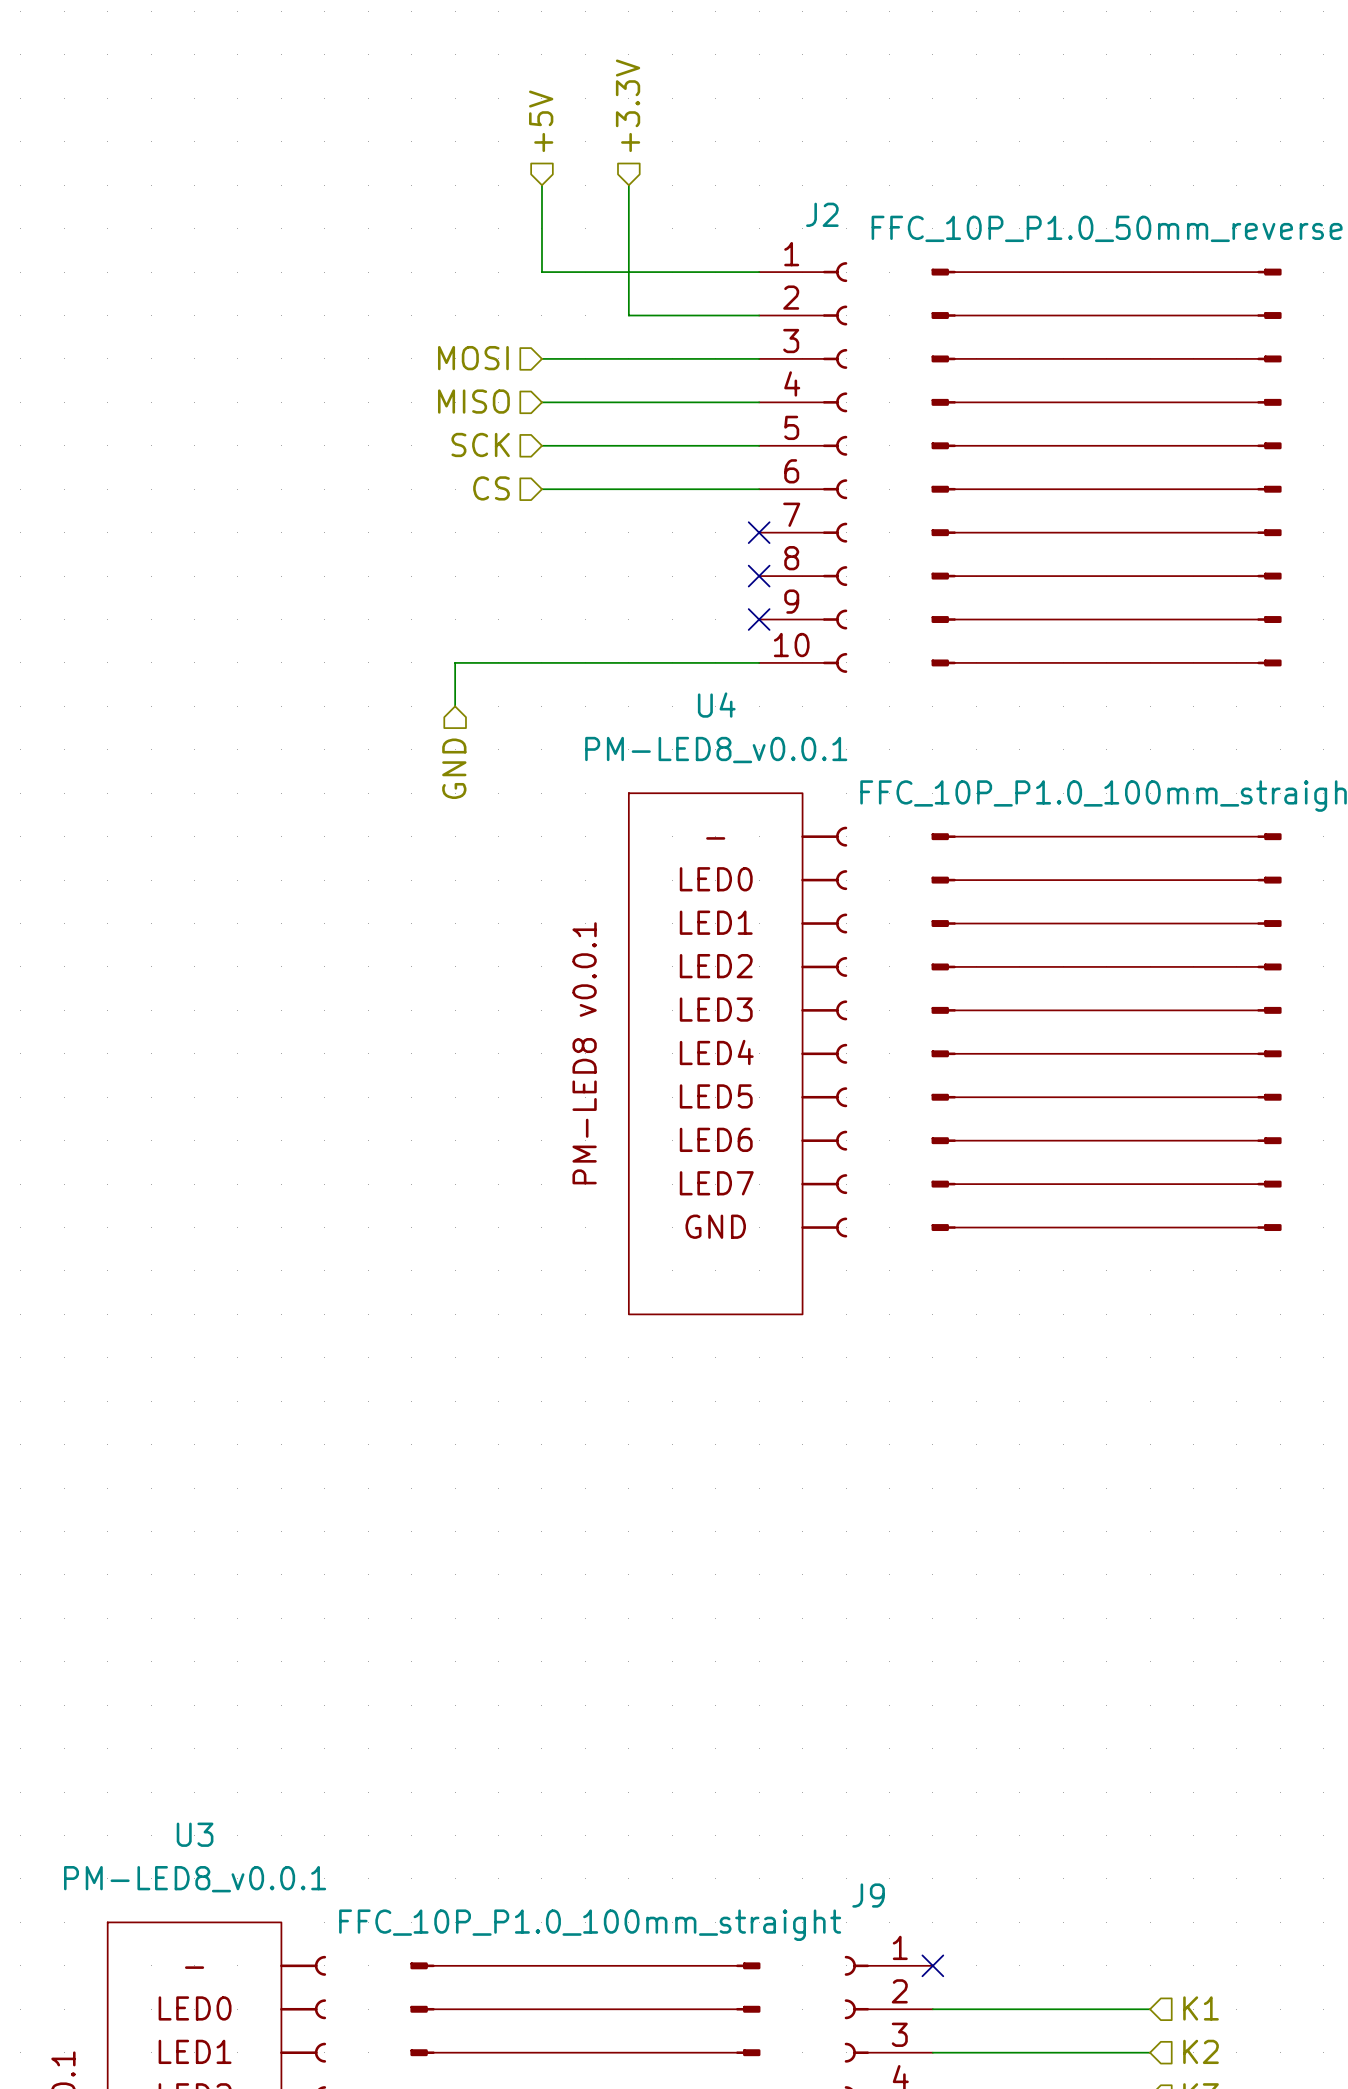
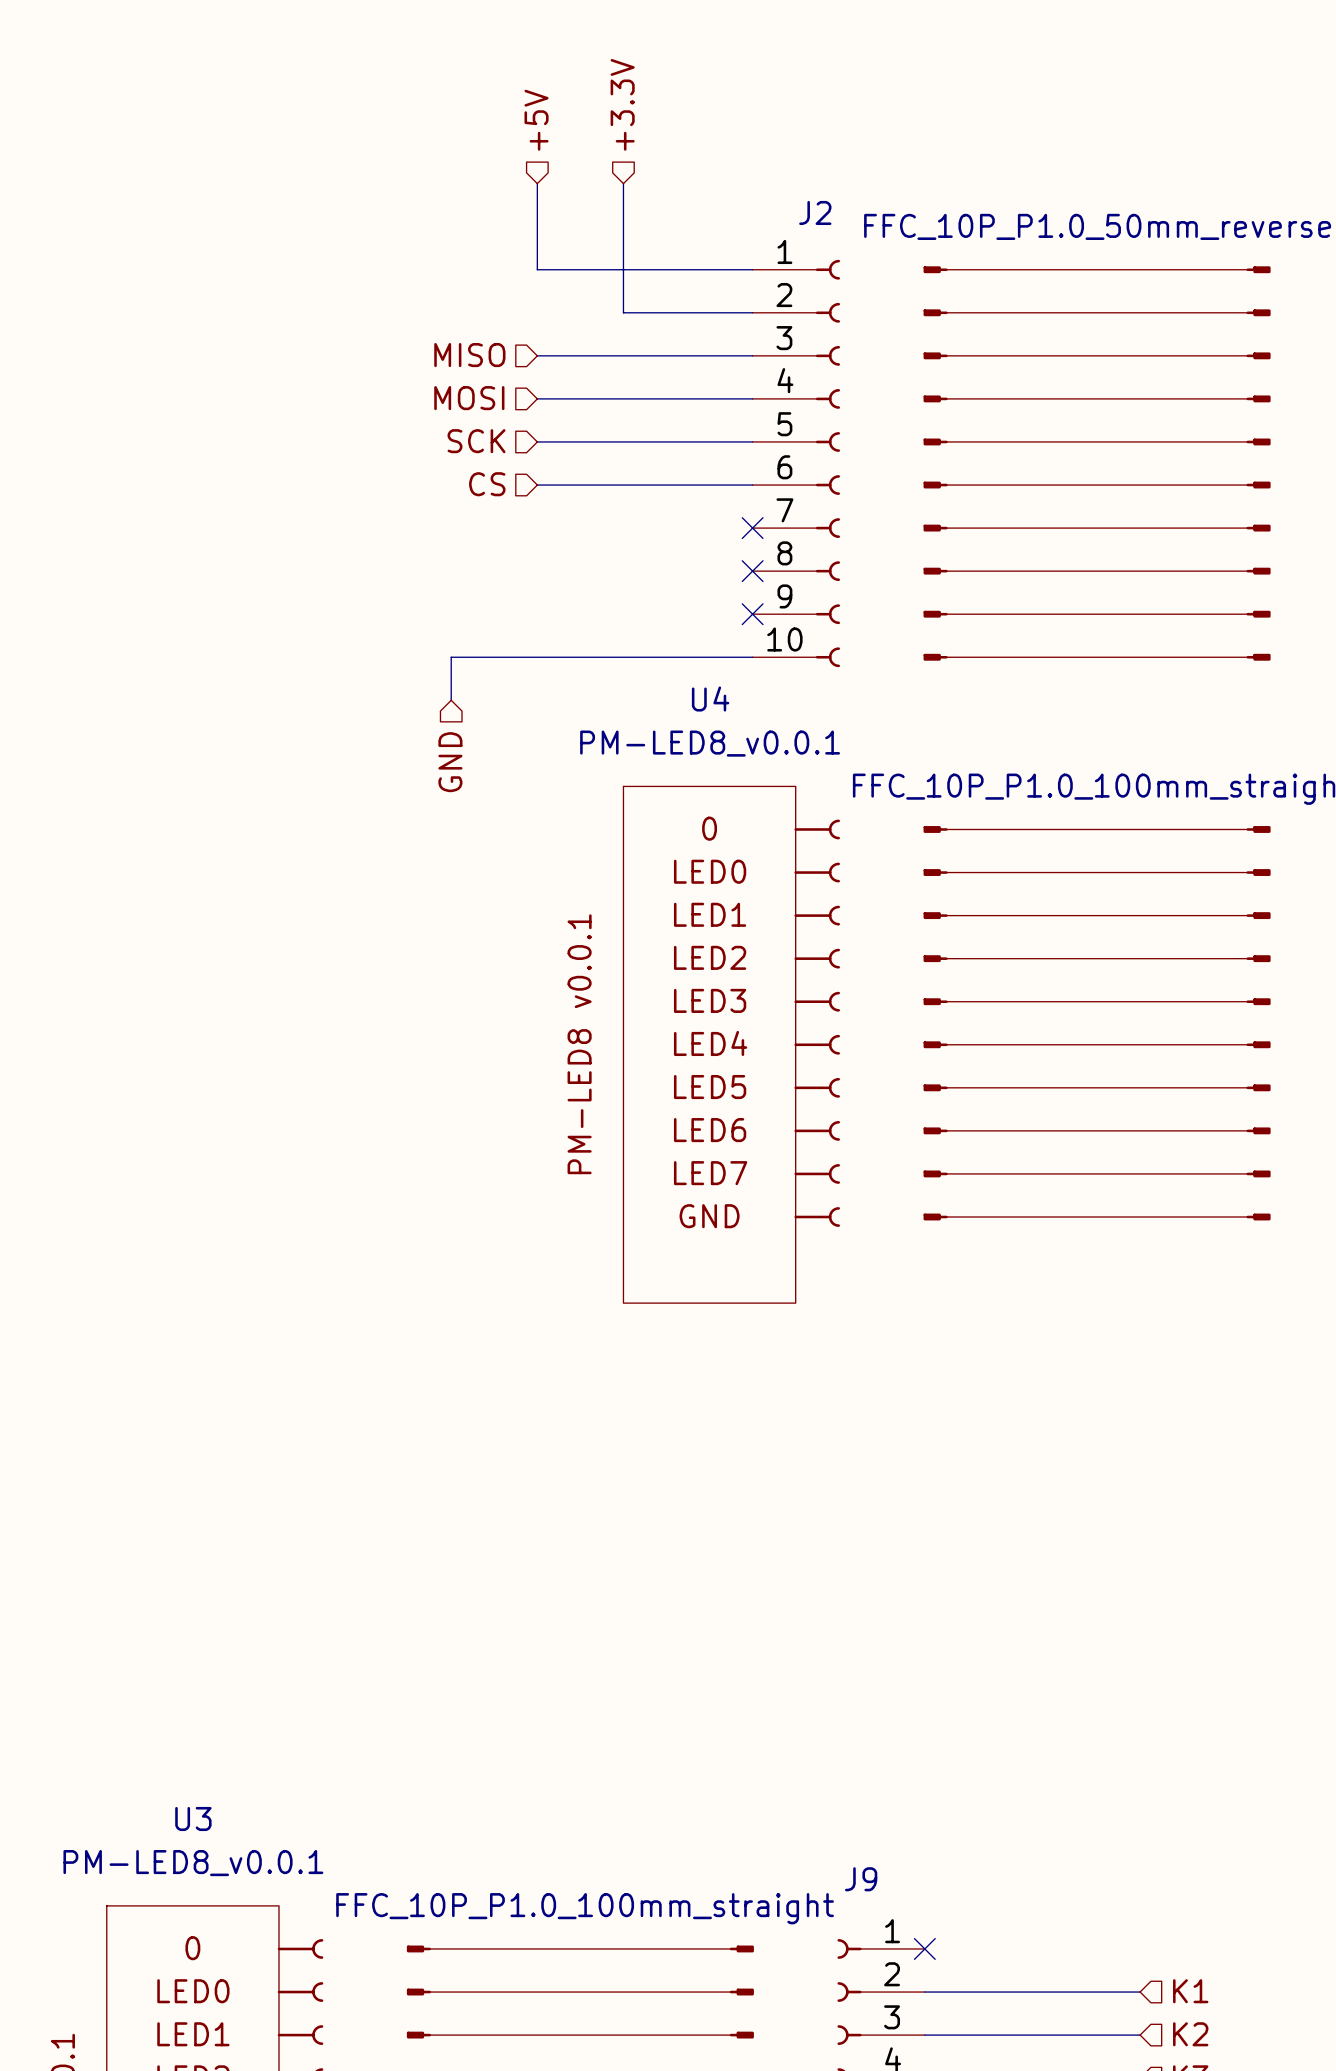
hierarchical label: MOSI (473, 358) -> MISO (469, 355)
hierarchical label: MISO (473, 401) -> MOSI (469, 398)
U4 text: - (715, 838) -> 0 (709, 828)
U3 text: - (194, 1967) -> 0 (192, 1948)

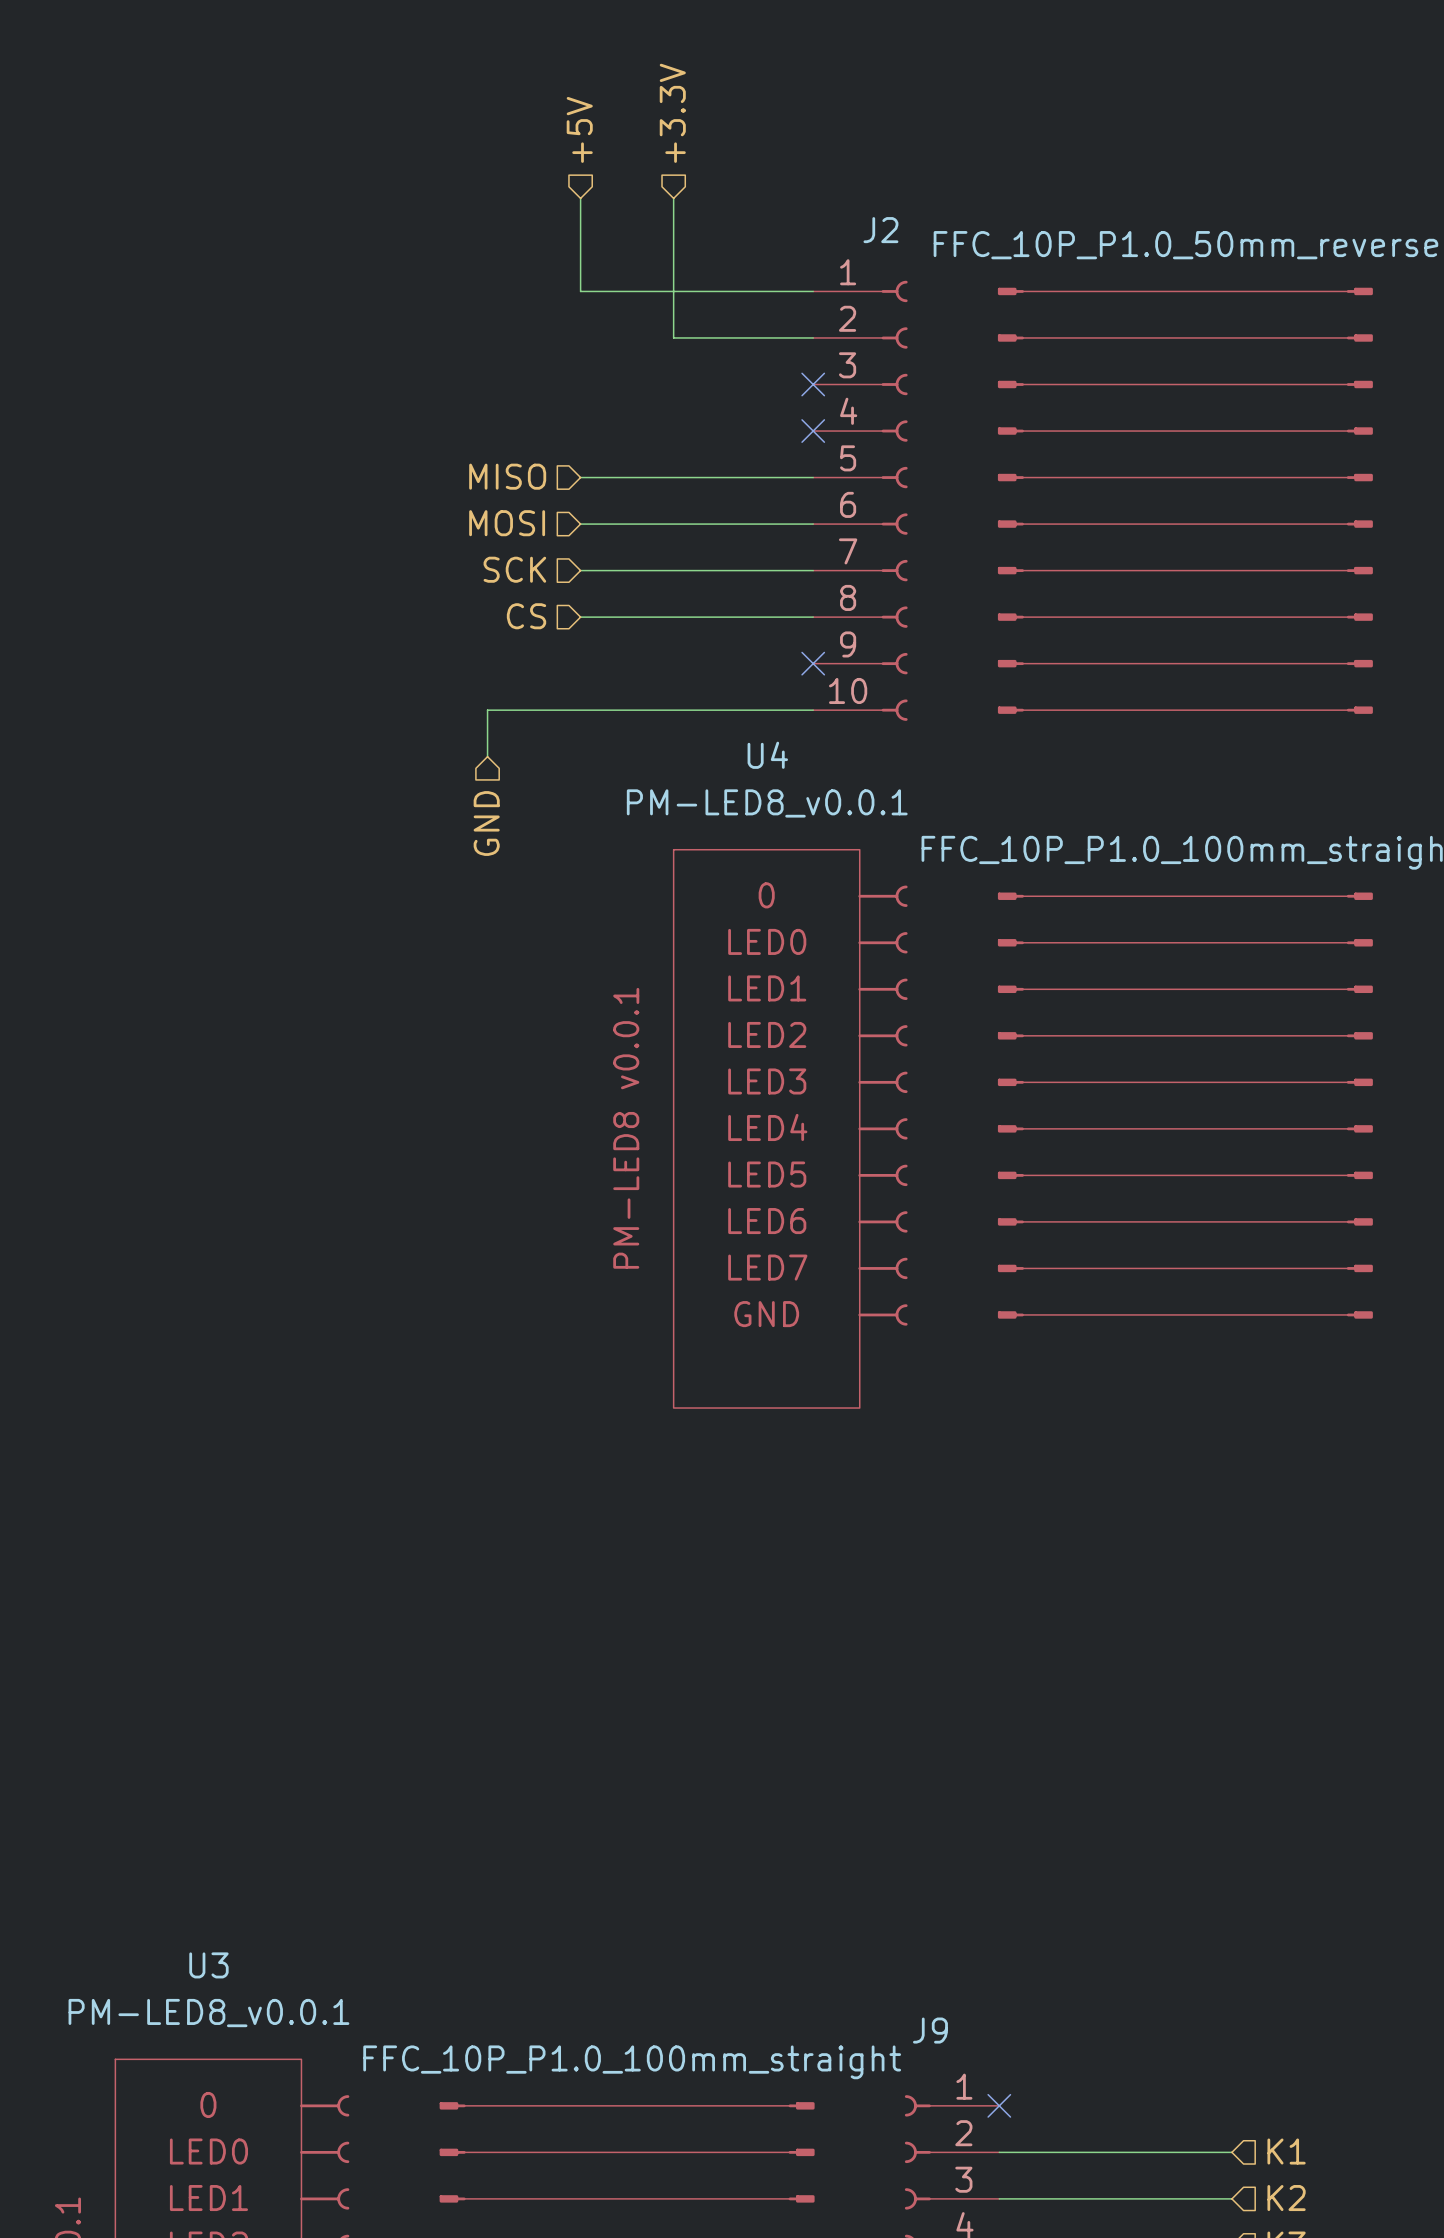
hierarchical label: MISO (469, 355) -> none
wire: (537, 355) (752, 355) -> (580, 617) (813, 617)
no-connect mark: none -> (813, 384)
hierarchical label: MOSI (469, 398) -> none
wire: (537, 398) (752, 398) -> (580, 570) (813, 570)
no-connect mark: none -> (813, 431)
hierarchical label: SCK (476, 441) -> MISO (507, 476)
hierarchical label: CS (487, 484) -> MOSI (507, 523)
hierarchical label: none -> SCK (514, 569)
no-connect mark: (752, 528) -> none
hierarchical label: none -> CS (526, 616)
no-connect mark: (752, 571) -> none

